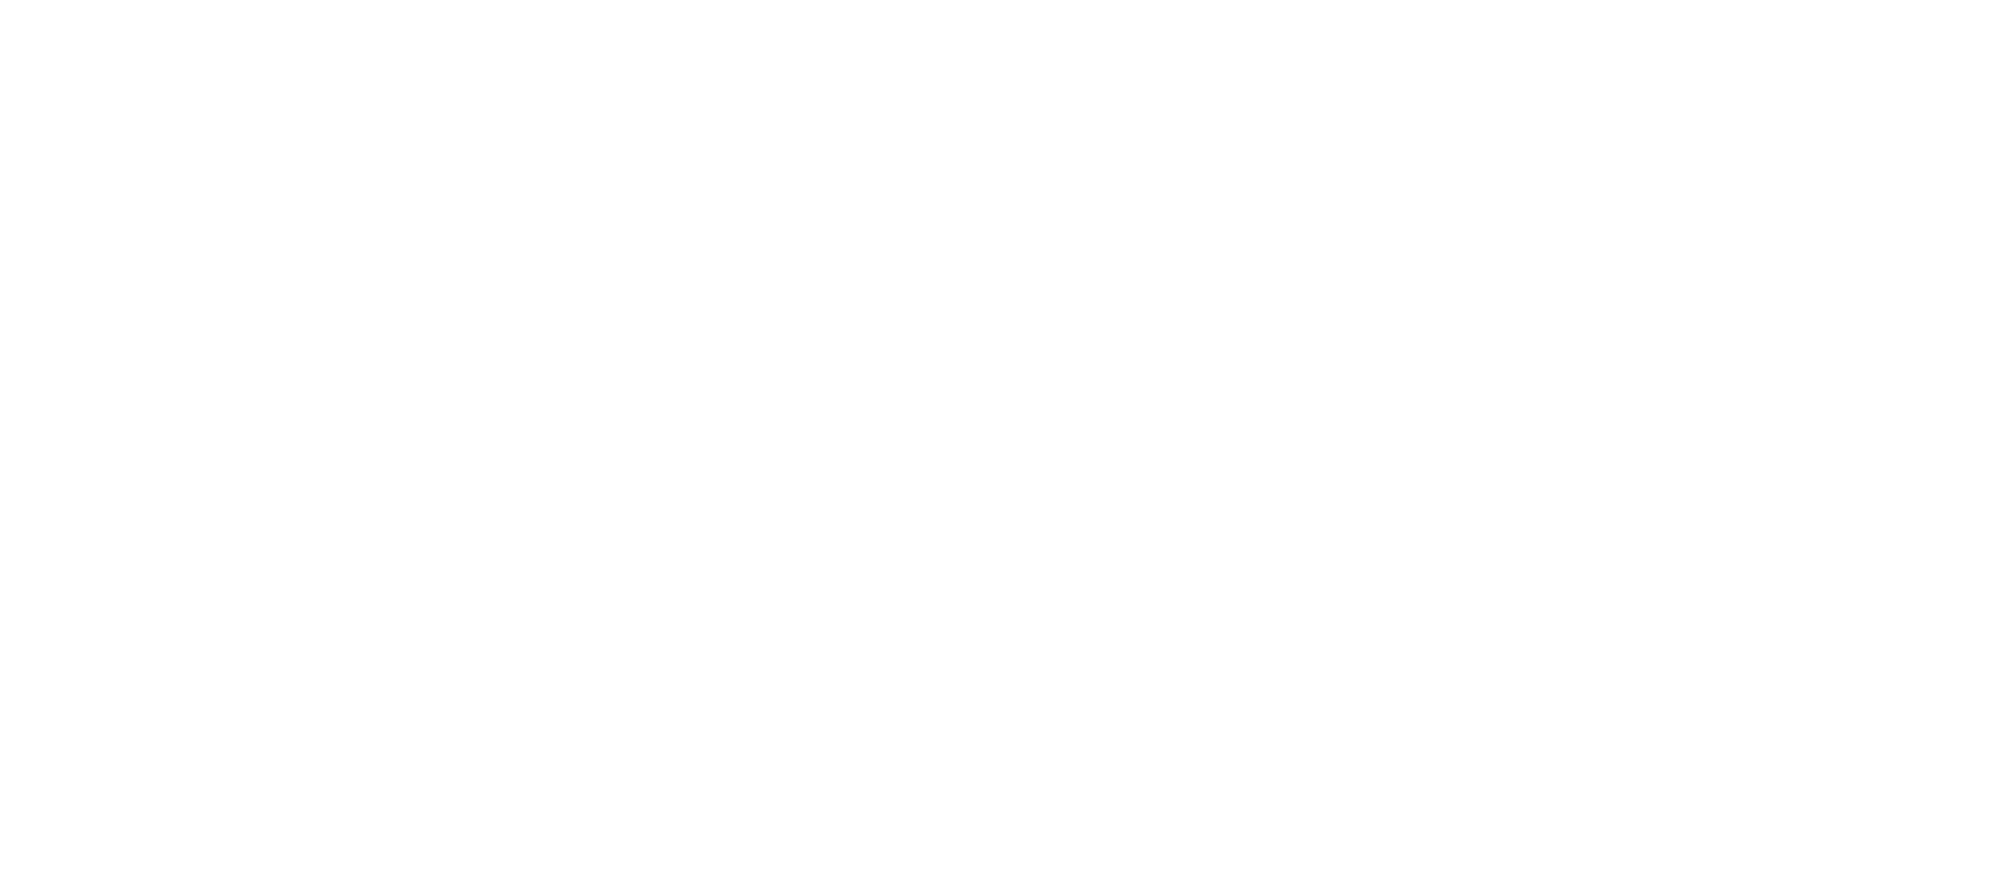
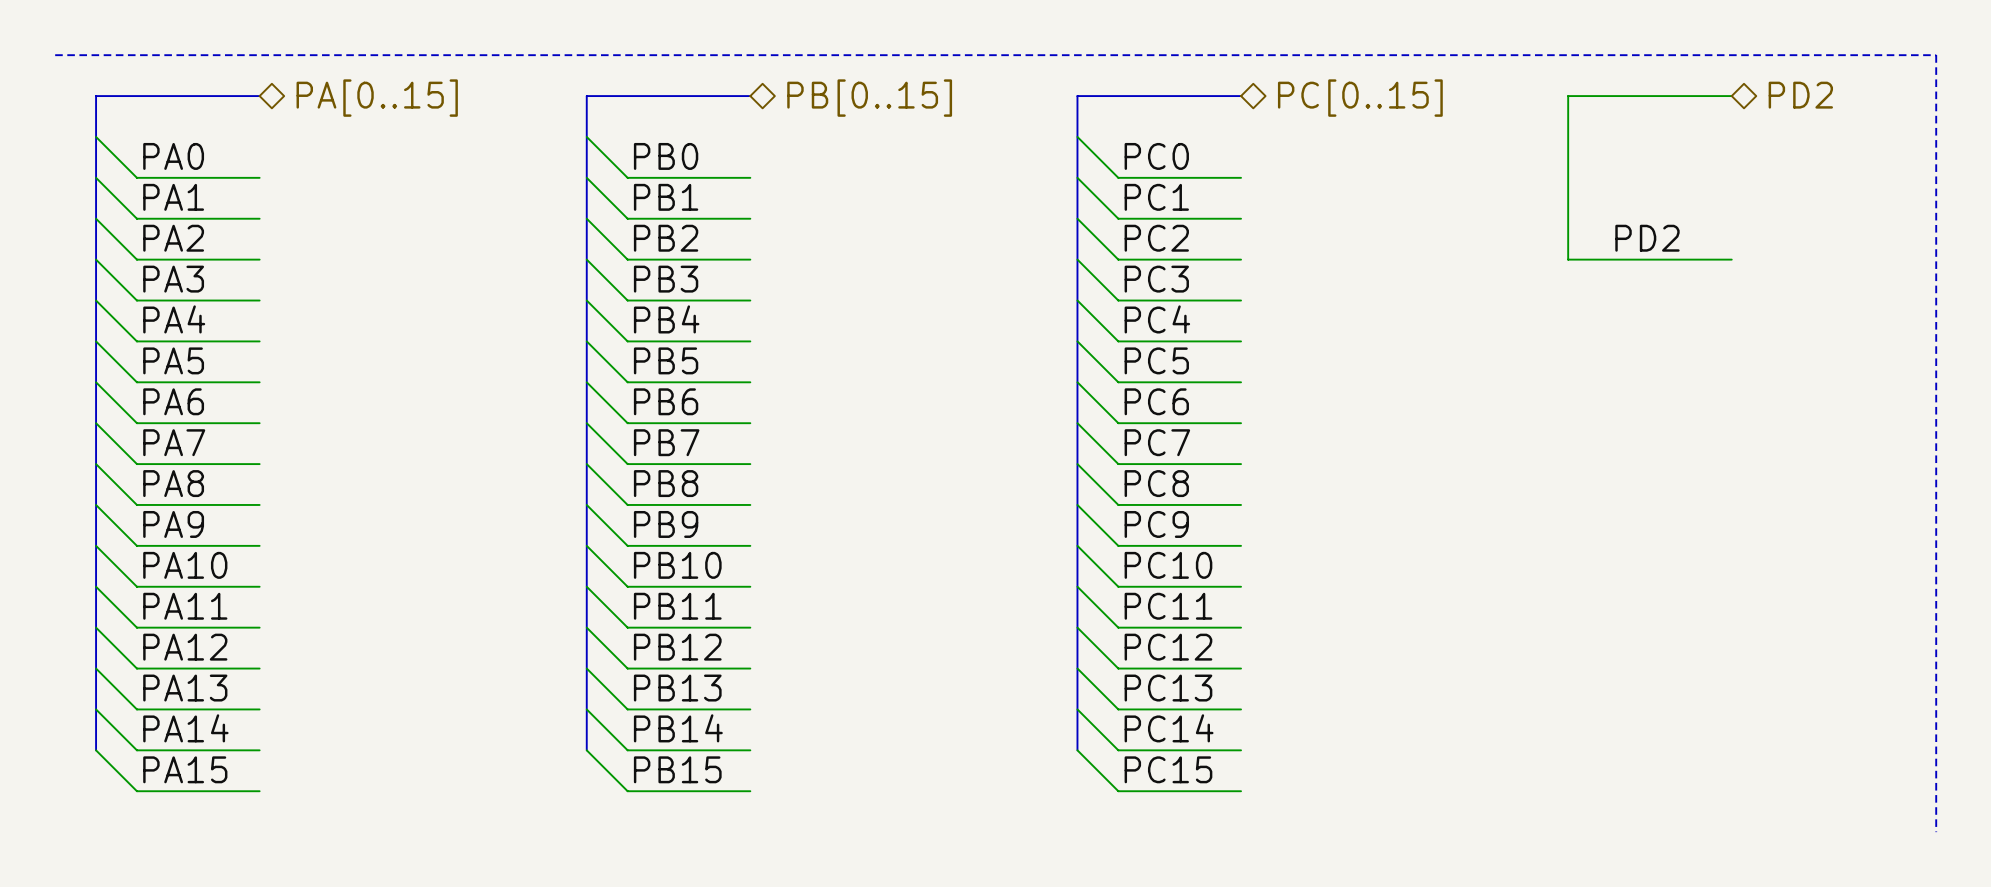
line: none -> (55, 55) (1936, 55) (1936, 832)
hierarchical label: none -> PD2 (1800, 95)
bus: none -> (259, 96) (96, 96) (96, 750)
bus: none -> (750, 96) (586, 96) (586, 750)
bus: none -> (1241, 96) (1077, 96) (1077, 750)
wire: none -> (1731, 96) (1568, 96) (1568, 259) (1731, 259)
hierarchical label: none -> PA[0..15] (377, 98)
hierarchical label: none -> PB[0..15] (869, 98)
hierarchical label: none -> PC[0..15] (1360, 98)
wire: none -> (96, 136) (136, 177) (259, 177)
wire: none -> (586, 136) (627, 177) (750, 177)
wire: none -> (1077, 136) (1118, 177) (1241, 177)
label: none -> PA0 (173, 156)
label: none -> PB0 (666, 156)
label: none -> PC0 (1156, 156)
wire: none -> (96, 177) (136, 218) (259, 218)
wire: none -> (586, 177) (627, 218) (750, 218)
wire: none -> (1077, 177) (1118, 218) (1241, 218)
label: none -> PA1 (173, 197)
label: none -> PB1 (666, 197)
label: none -> PC1 (1156, 197)
wire: none -> (96, 218) (136, 259) (259, 259)
wire: none -> (586, 218) (627, 259) (750, 259)
wire: none -> (1077, 218) (1118, 259) (1241, 259)
label: none -> PA2 (173, 238)
label: none -> PB2 (666, 238)
label: none -> PC2 (1156, 238)
label: none -> PD2 (1647, 238)
wire: none -> (96, 259) (136, 300) (259, 300)
wire: none -> (586, 259) (627, 300) (750, 300)
wire: none -> (1077, 259) (1118, 300) (1241, 300)
label: none -> PA3 (173, 279)
label: none -> PB3 (666, 279)
label: none -> PC3 (1156, 279)
wire: none -> (96, 300) (136, 341) (259, 341)
wire: none -> (586, 300) (627, 341) (750, 341)
wire: none -> (1077, 300) (1118, 341) (1241, 341)
label: none -> PA4 (174, 319)
label: none -> PB4 (666, 319)
label: none -> PC4 (1157, 319)
wire: none -> (96, 341) (136, 382) (259, 382)
wire: none -> (586, 341) (627, 382) (750, 382)
wire: none -> (1077, 341) (1118, 382) (1241, 382)
label: none -> PA5 (173, 360)
label: none -> PB5 (666, 360)
label: none -> PC5 (1156, 360)
wire: none -> (96, 382) (136, 423) (259, 423)
wire: none -> (586, 382) (627, 423) (750, 423)
wire: none -> (1077, 382) (1118, 423) (1241, 423)
label: none -> PA6 (173, 401)
label: none -> PB6 (666, 401)
label: none -> PC6 (1156, 401)
wire: none -> (96, 423) (136, 464) (259, 464)
wire: none -> (586, 423) (627, 464) (750, 464)
wire: none -> (1077, 423) (1118, 464) (1241, 464)
label: none -> PA7 (174, 442)
label: none -> PB7 (666, 442)
label: none -> PC7 (1157, 442)
wire: none -> (96, 464) (136, 504) (259, 504)
wire: none -> (586, 464) (627, 504) (750, 504)
wire: none -> (1077, 464) (1118, 504) (1241, 504)
label: none -> PA8 (173, 483)
label: none -> PB8 (666, 483)
label: none -> PC8 (1156, 483)
wire: none -> (96, 504) (136, 545) (259, 545)
wire: none -> (586, 504) (627, 545) (750, 545)
wire: none -> (1077, 504) (1118, 545) (1241, 545)
label: none -> PA9 (173, 524)
label: none -> PB9 (666, 524)
label: none -> PC9 (1156, 524)
wire: none -> (96, 545) (136, 586) (259, 586)
wire: none -> (586, 545) (627, 586) (750, 586)
wire: none -> (1077, 545) (1118, 586) (1241, 586)
label: none -> PA10 (185, 565)
label: none -> PB10 (677, 565)
label: none -> PC10 (1168, 565)
wire: none -> (96, 586) (136, 627) (259, 627)
wire: none -> (586, 586) (627, 627) (750, 627)
wire: none -> (1077, 586) (1118, 627) (1241, 627)
label: none -> PA11 (185, 606)
label: none -> PB11 (677, 606)
label: none -> PC11 (1168, 606)
wire: none -> (96, 627) (136, 668) (259, 668)
wire: none -> (586, 627) (627, 668) (750, 668)
wire: none -> (1077, 627) (1118, 668) (1241, 668)
label: none -> PA12 (185, 647)
label: none -> PB12 (677, 647)
label: none -> PC12 (1168, 647)
wire: none -> (96, 668) (136, 709) (259, 709)
wire: none -> (586, 668) (627, 709) (750, 709)
wire: none -> (1077, 668) (1118, 709) (1241, 709)
label: none -> PA13 (185, 688)
label: none -> PB13 (677, 688)
label: none -> PC13 (1168, 688)
wire: none -> (96, 709) (136, 750) (259, 750)
wire: none -> (586, 709) (627, 750) (750, 750)
wire: none -> (1077, 709) (1118, 750) (1241, 750)
label: none -> PA14 (185, 728)
label: none -> PB14 (678, 728)
label: none -> PC14 (1169, 728)
wire: none -> (96, 750) (136, 791) (259, 791)
wire: none -> (586, 750) (627, 791) (750, 791)
wire: none -> (1077, 750) (1118, 791) (1241, 791)
label: none -> PA15 (185, 769)
label: none -> PB15 (677, 769)
label: none -> PC15 (1168, 769)

